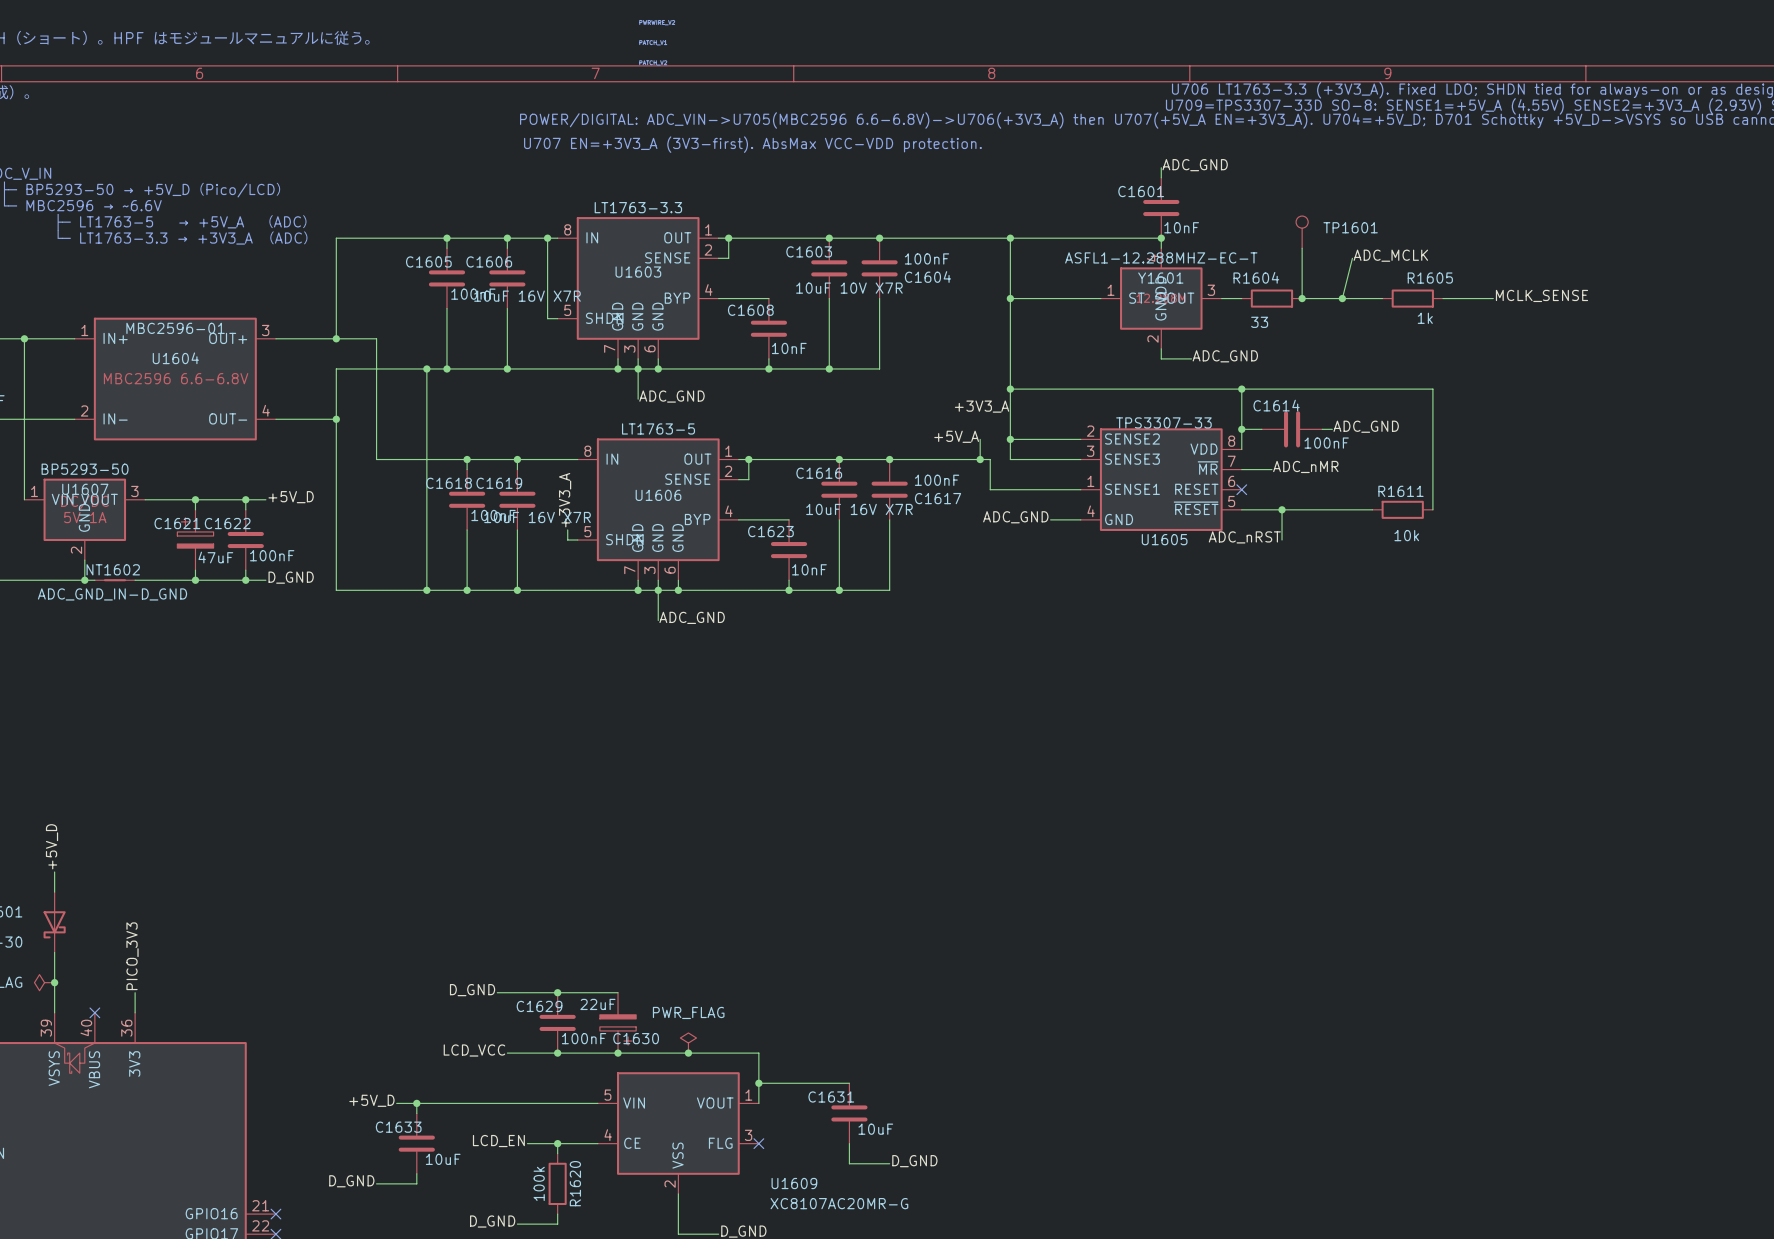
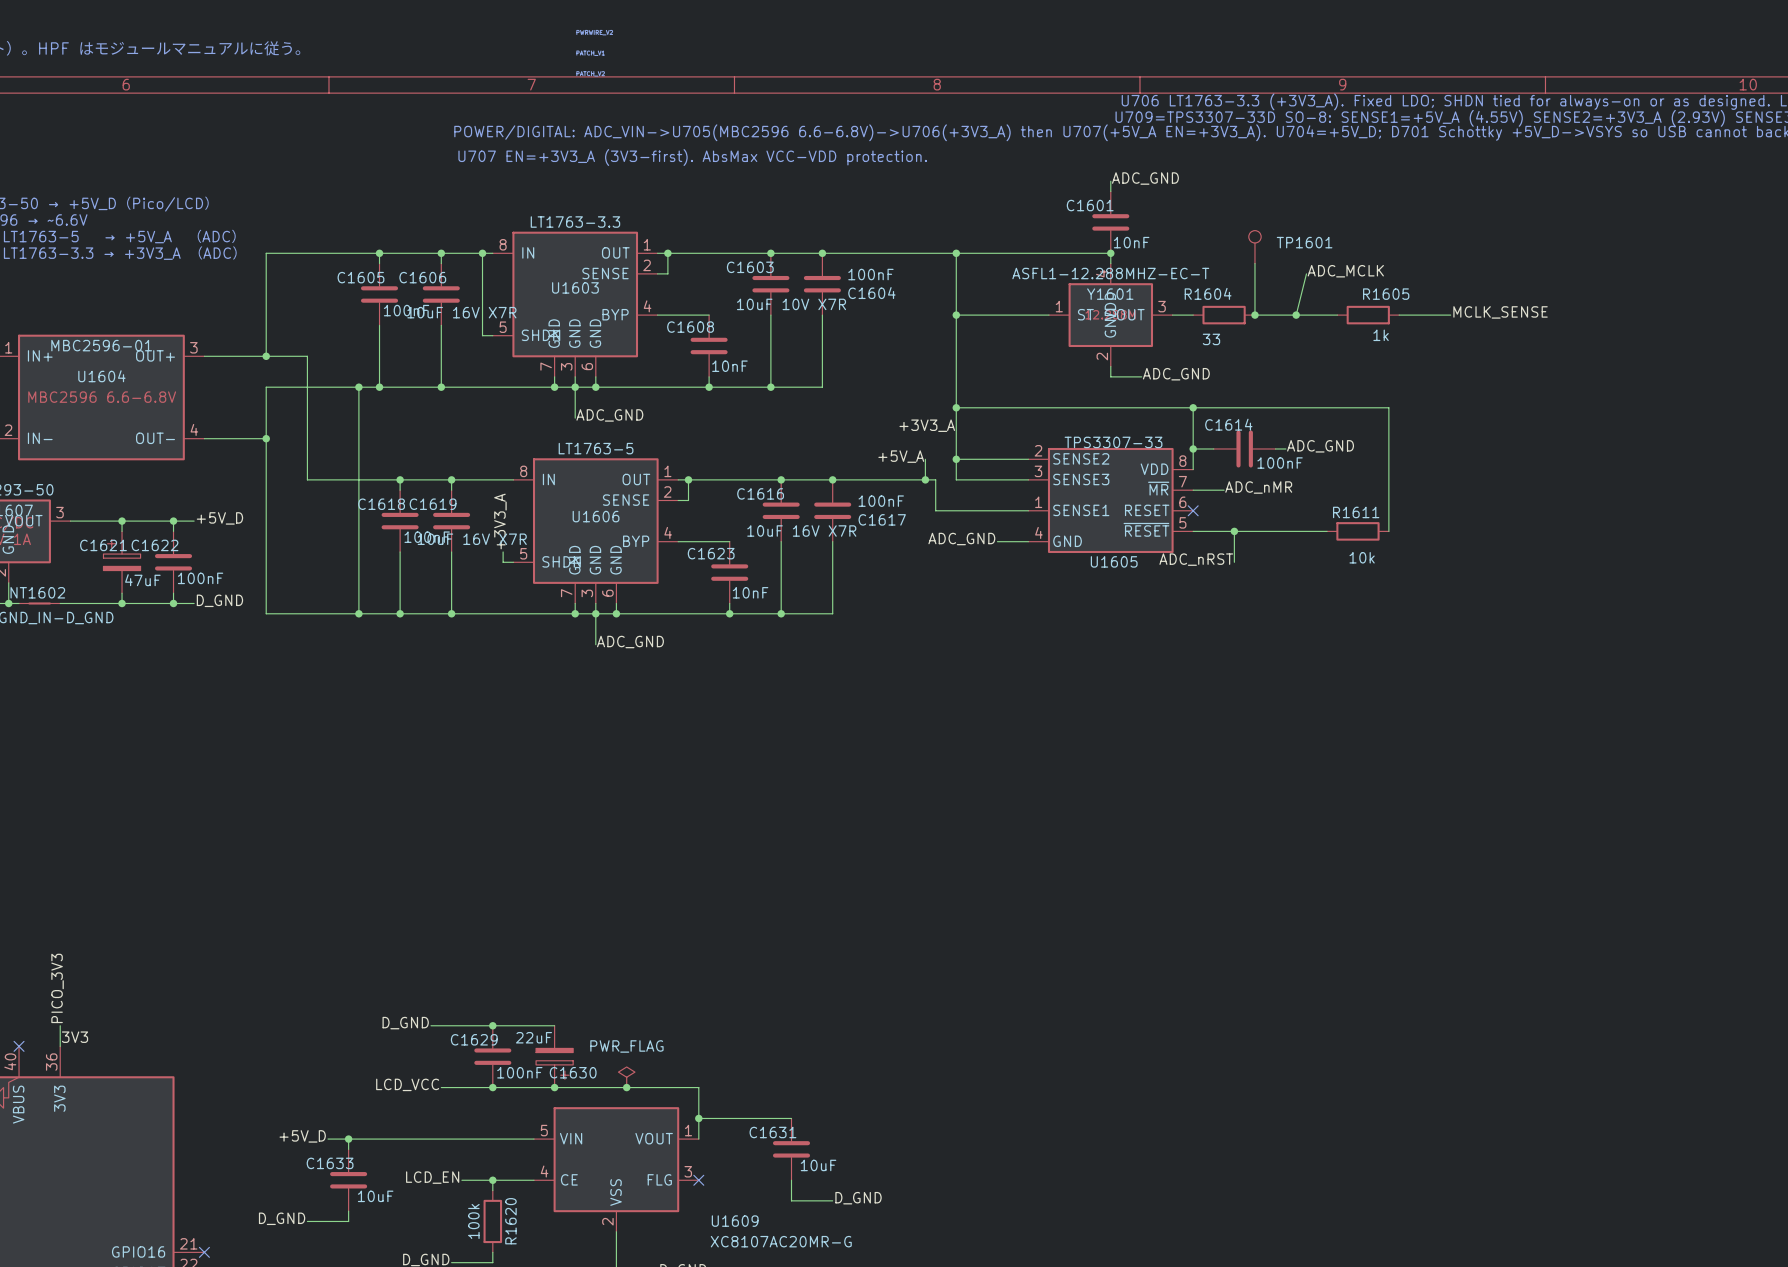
label: none -> 3V3 (75, 1037)

